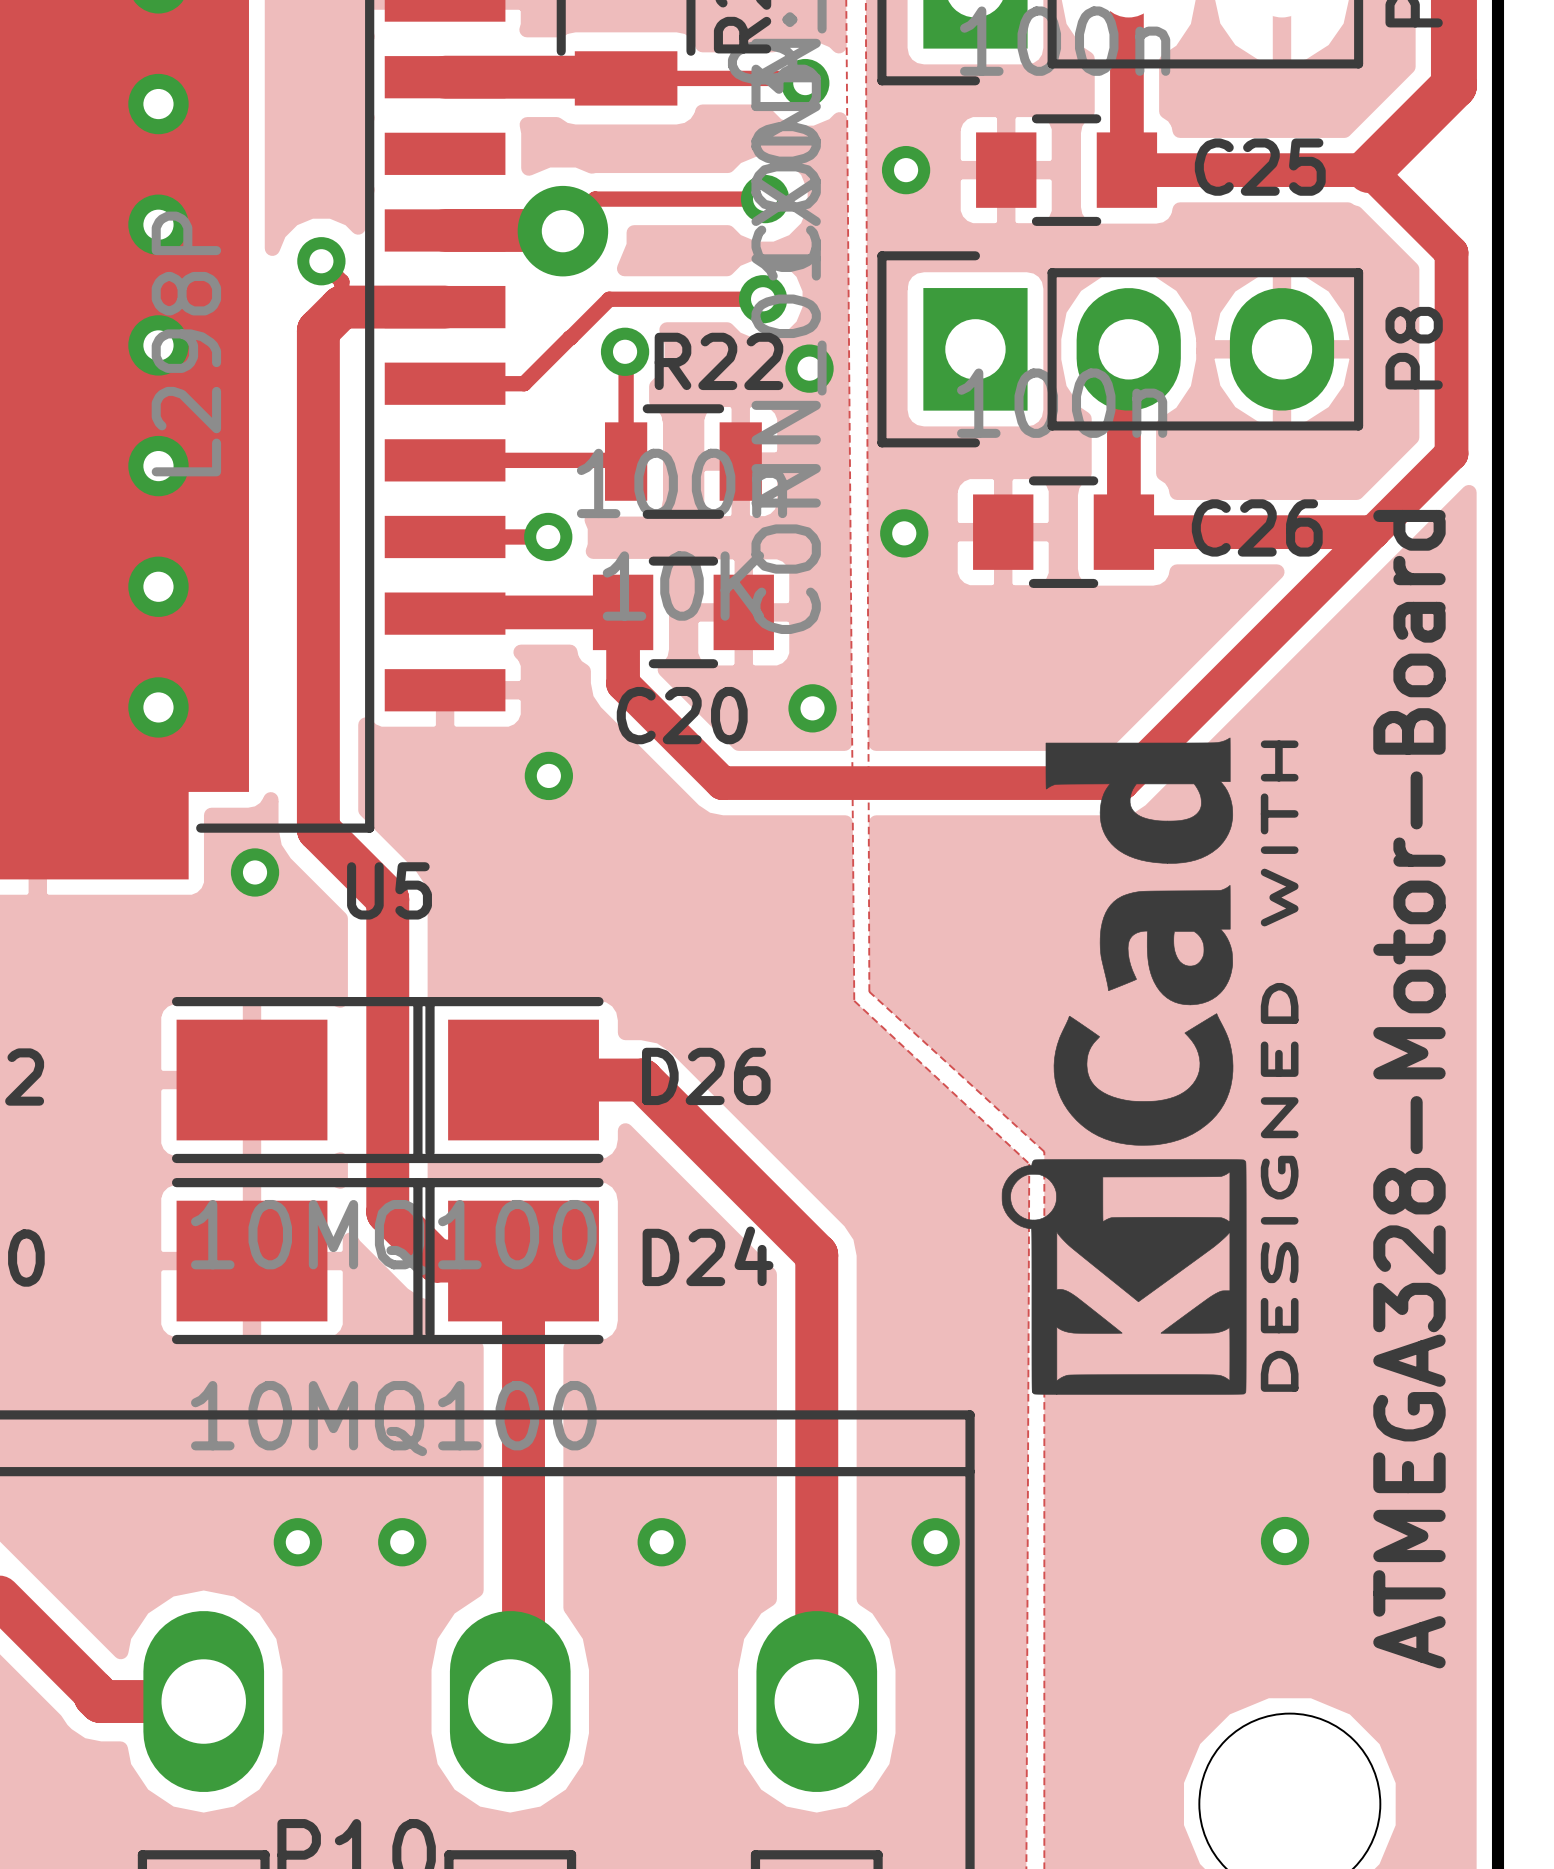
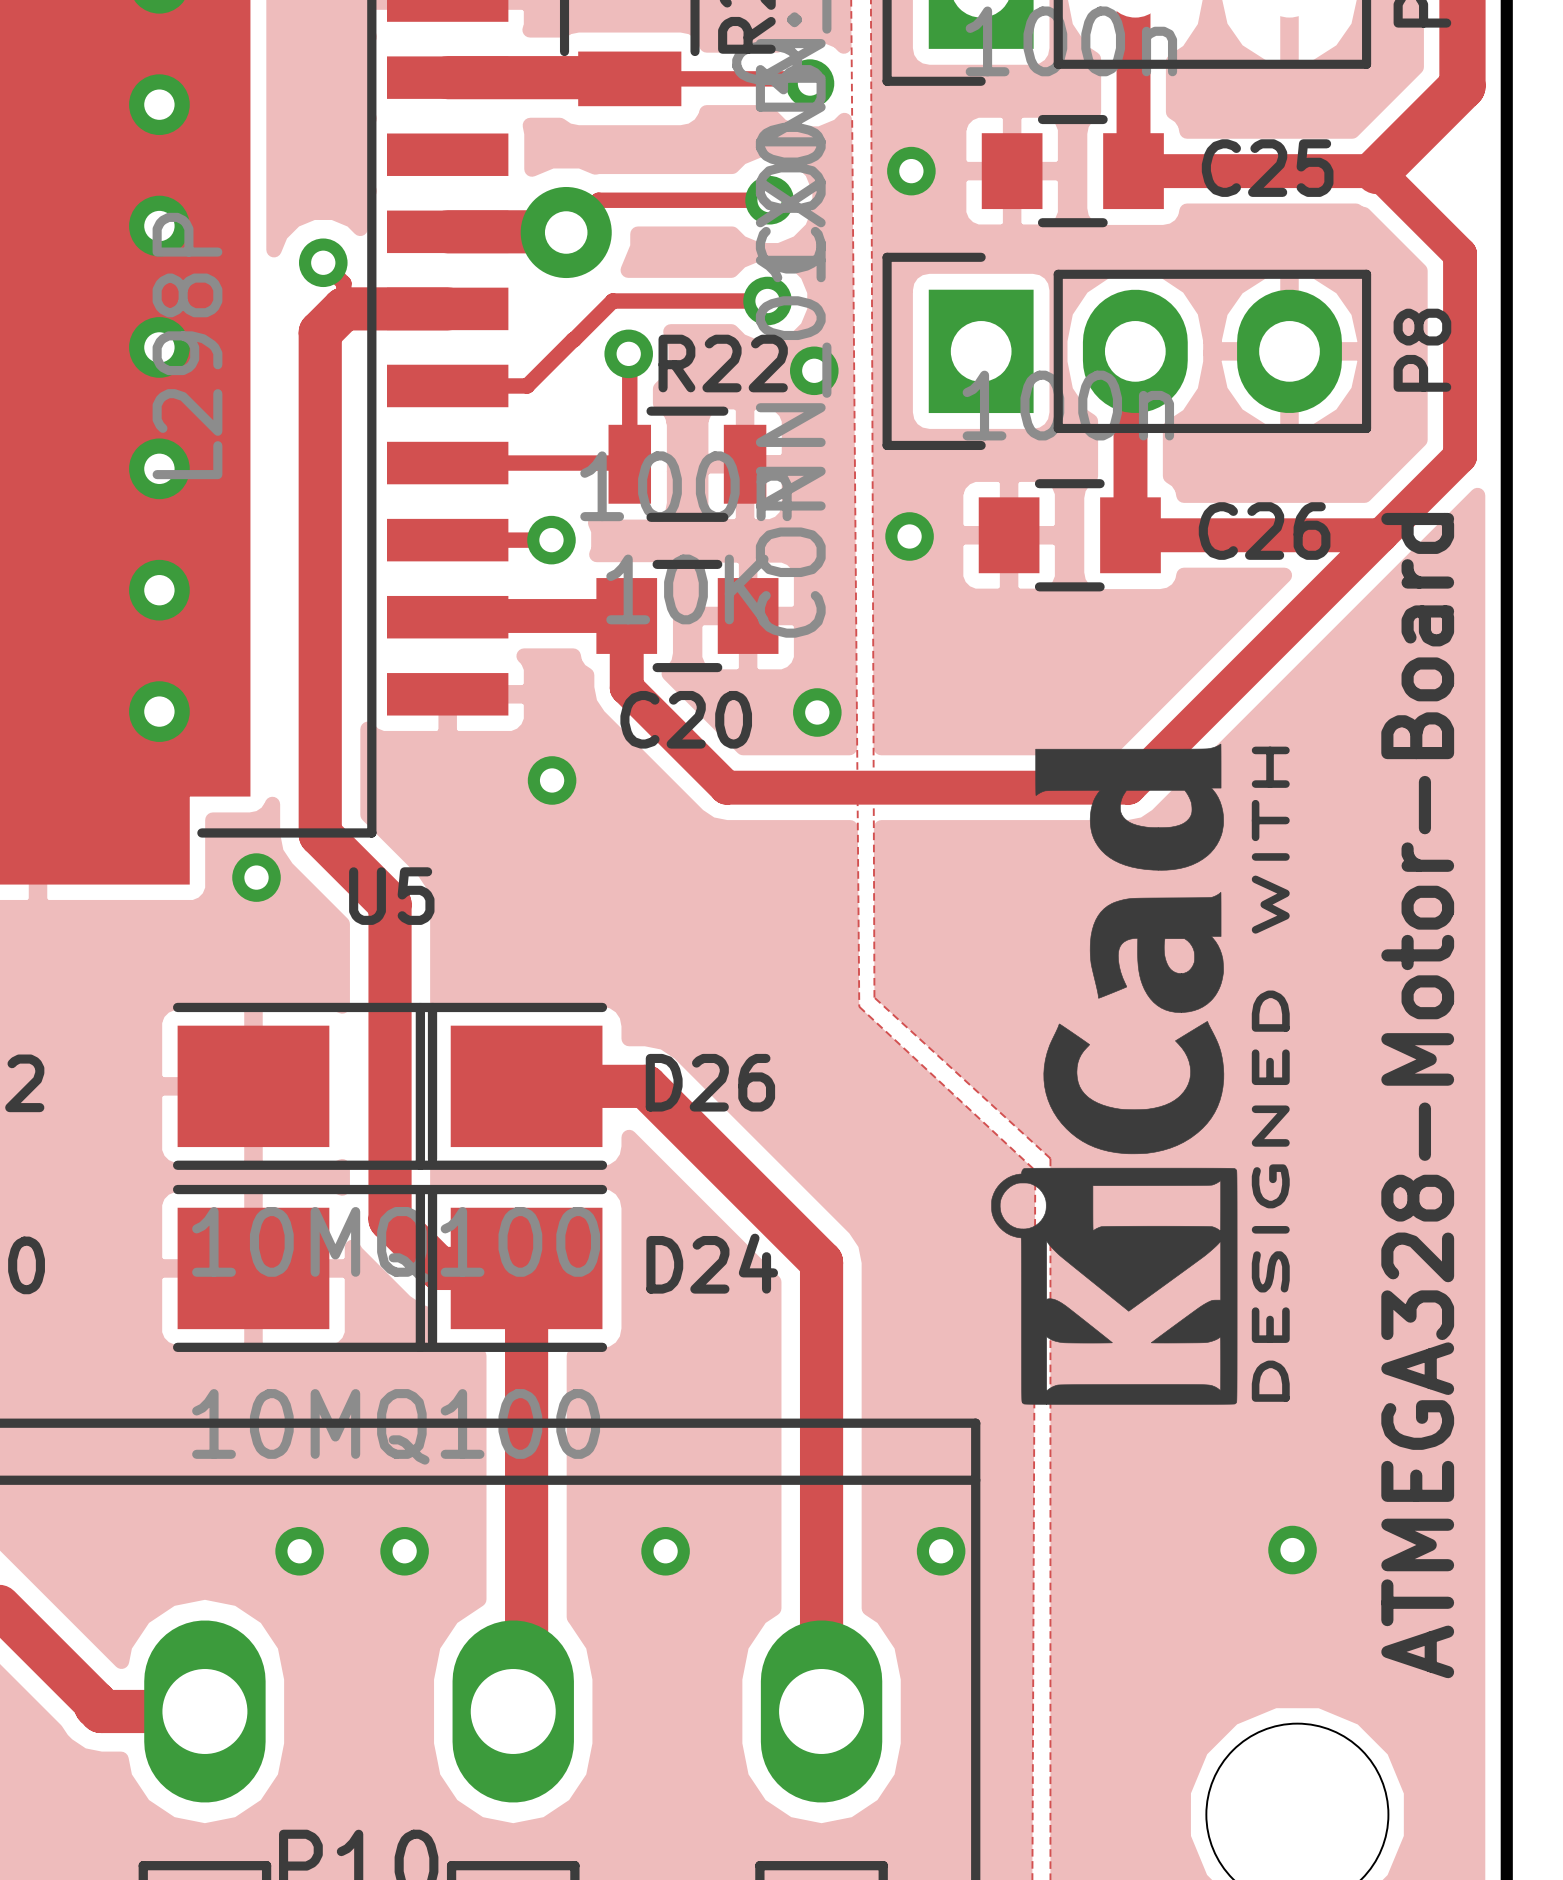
drawing position: (1124, 1066) -> (1114, 1074)

